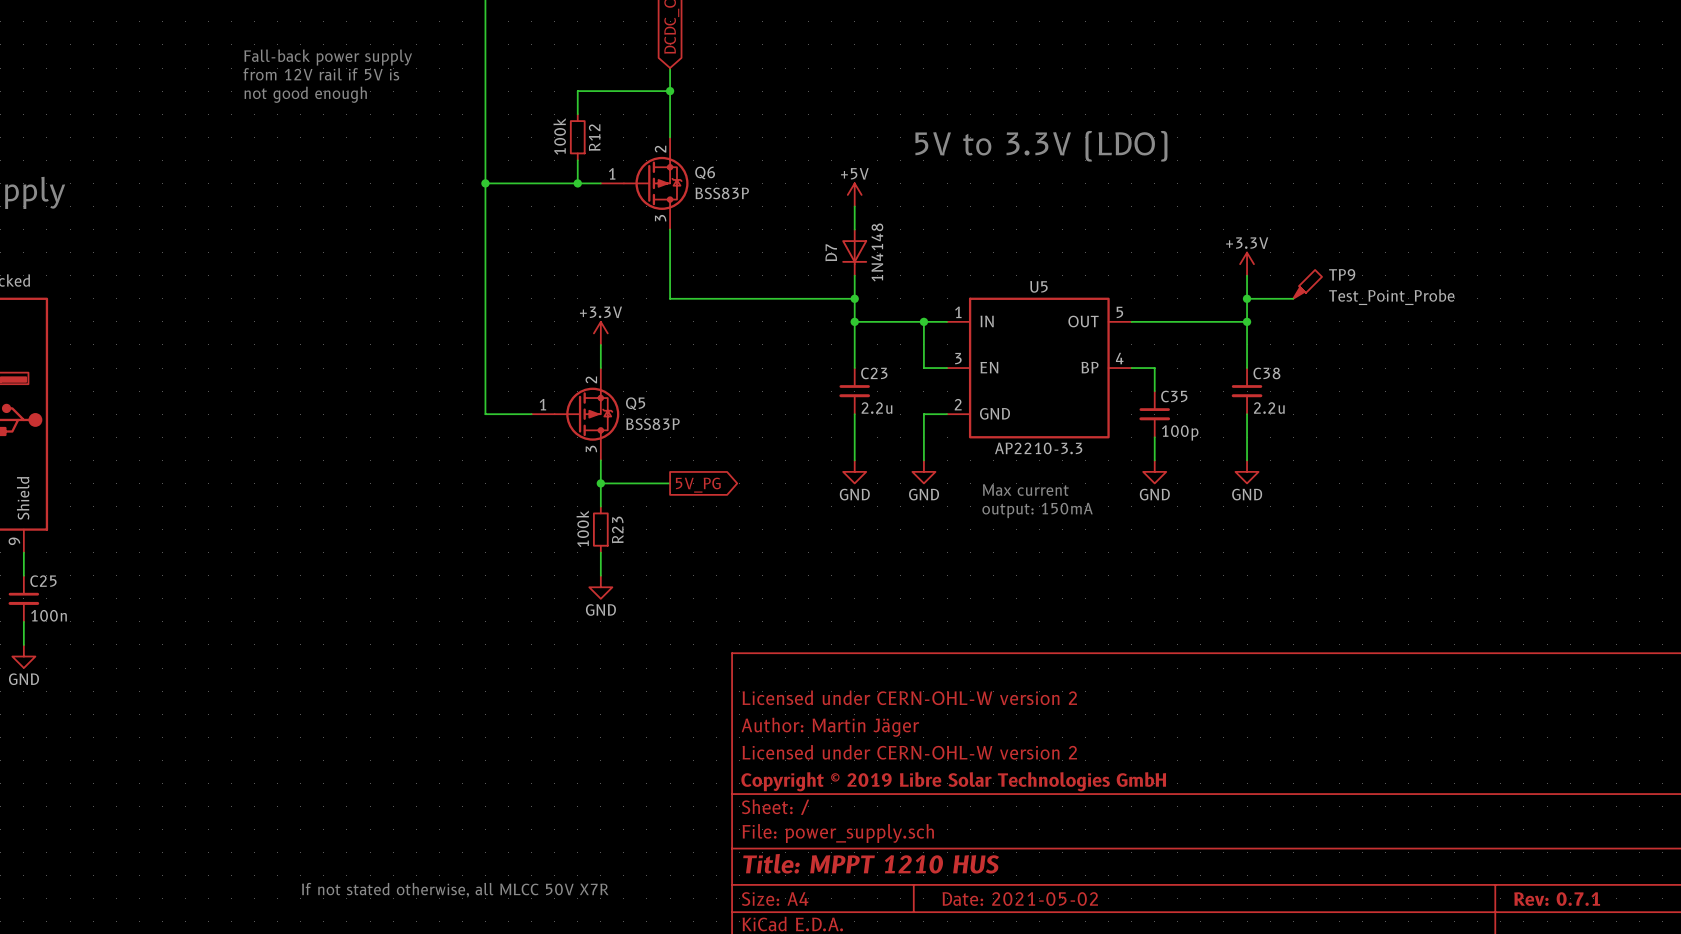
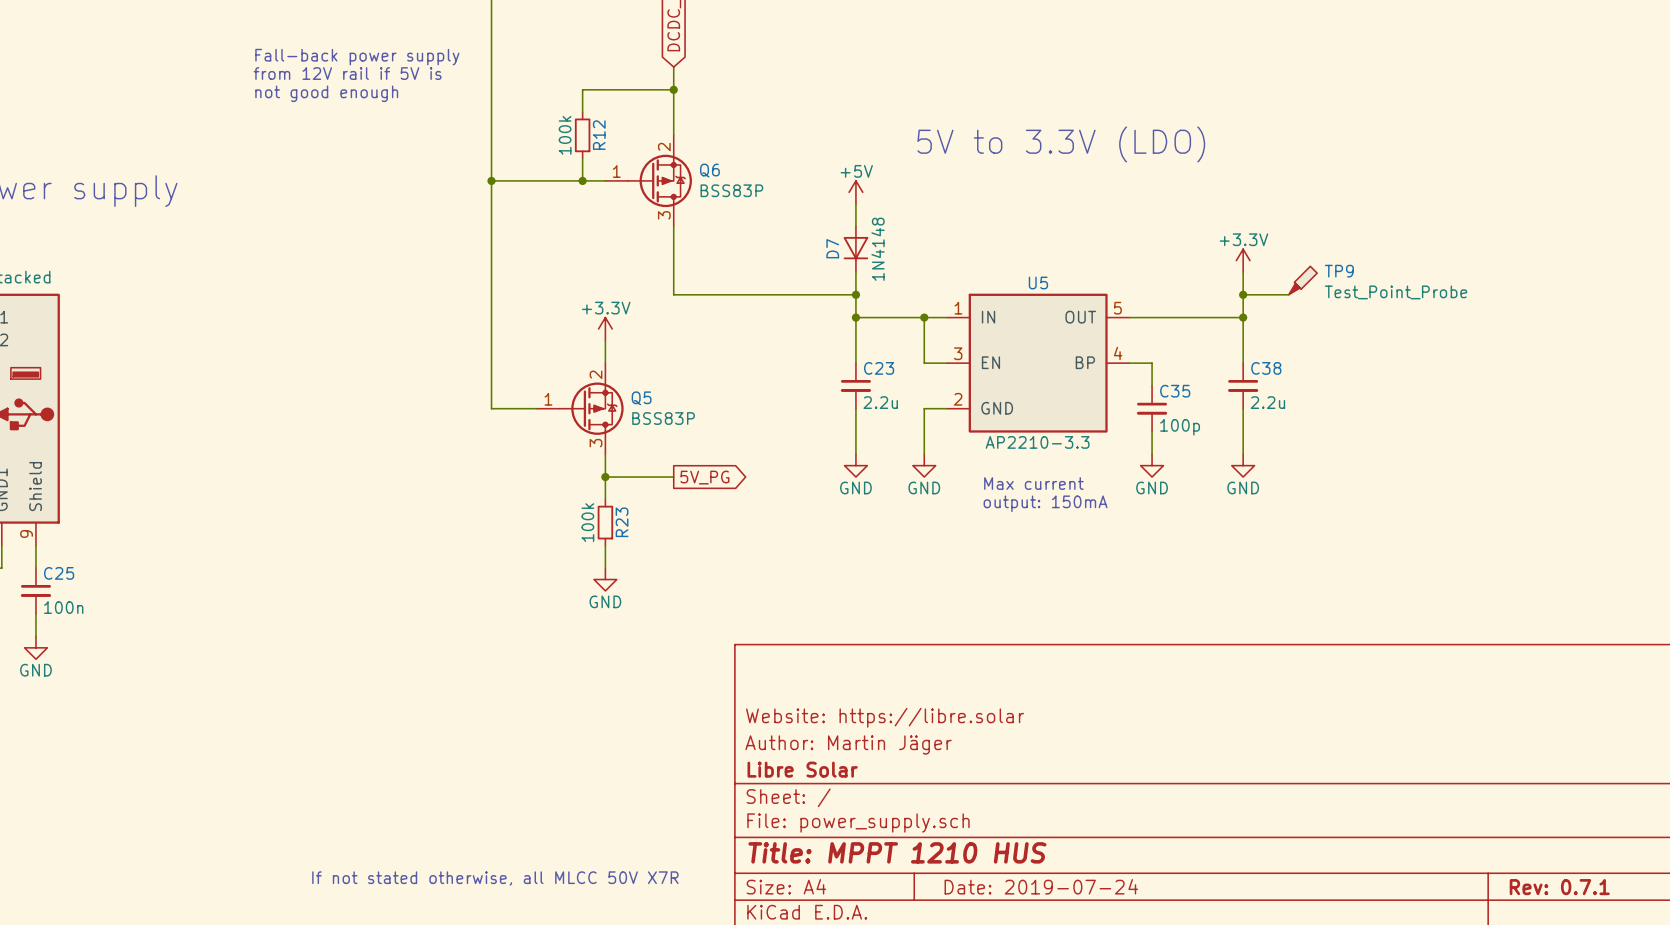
title block: Licensed under CERN-OHL-W version 2 (909, 697) -> none
title block: Author: Martin Jäger (830, 727) -> Website: https://libre.solar (885, 717)
title block: Licensed under CERN-OHL-W version 2 (909, 752) -> Author: Martin Jäger (848, 744)
title block: Copyright © 2019 Libre Solar Technologies GmbH (953, 781) -> Libre Solar (802, 769)
title block: Date: 2021-05-02 (1020, 899) -> Date: 2019-07-24 (1041, 886)

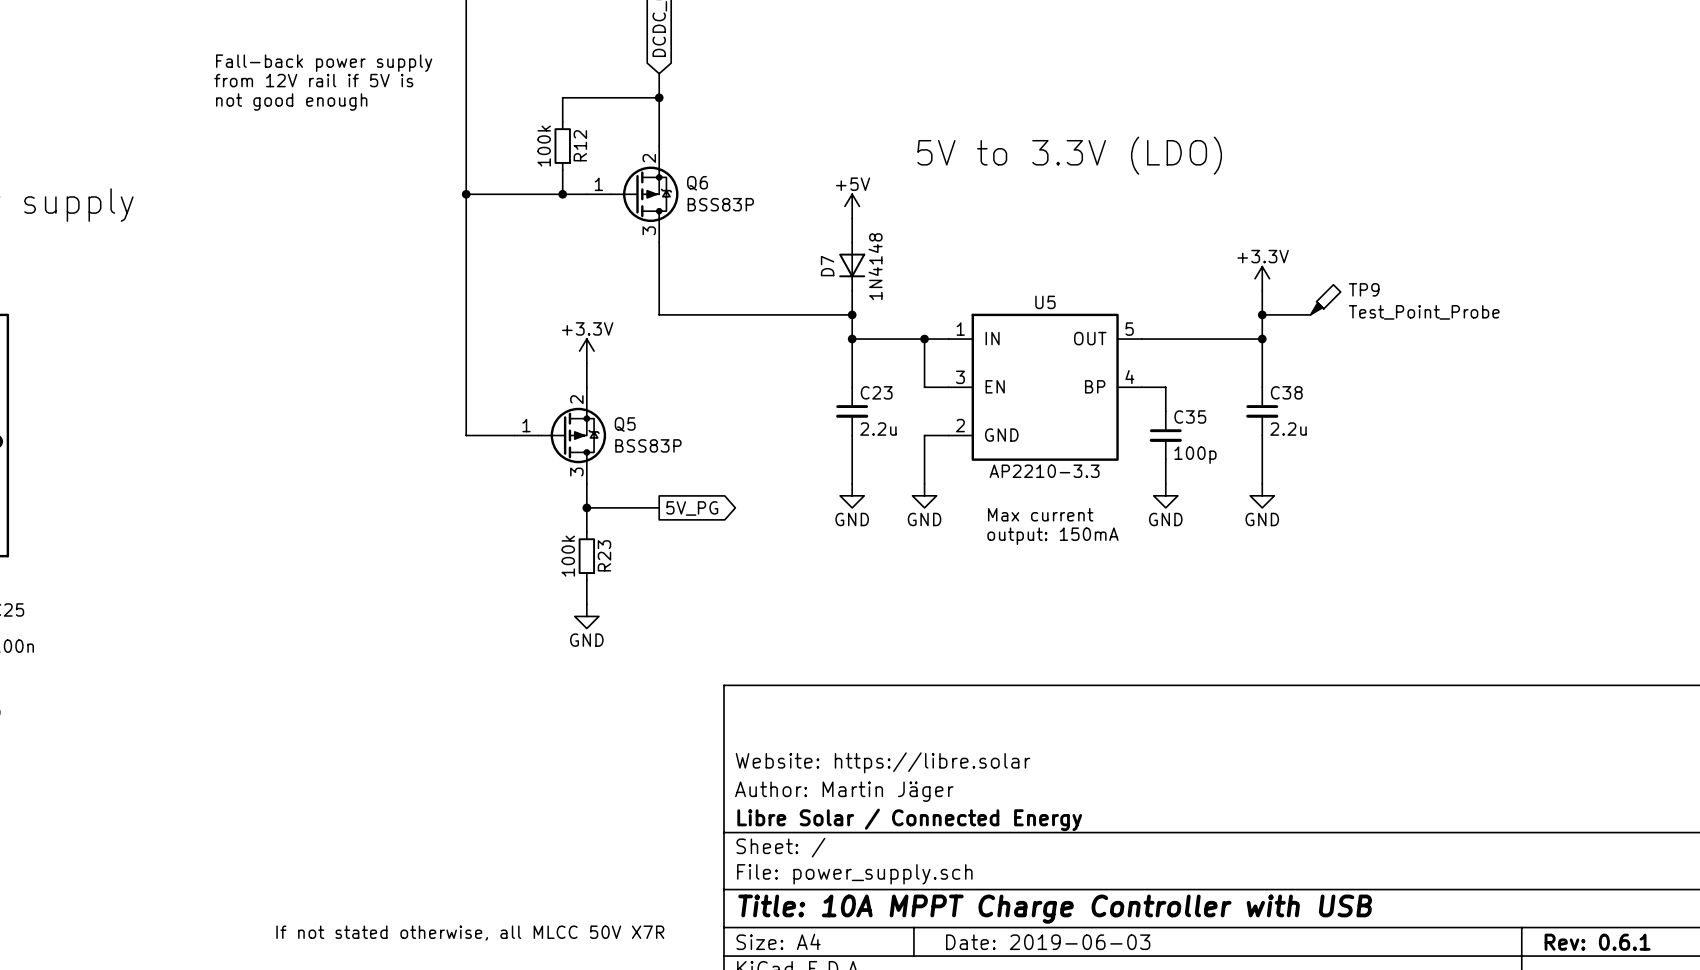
title block: Libre Solar (802, 769) -> Libre Solar / Connected Energy (909, 819)
title block: Title: MPPT 1210 HUS (897, 852) -> Title: 10A MPPT Charge Controller with USB (1055, 909)
title block: Date: 2019-07-24 (1041, 886) -> Date: 2019-06-03 (1048, 942)
title block: Rev: 0.7.1 (1559, 887) -> Rev: 0.6.1 (1597, 942)

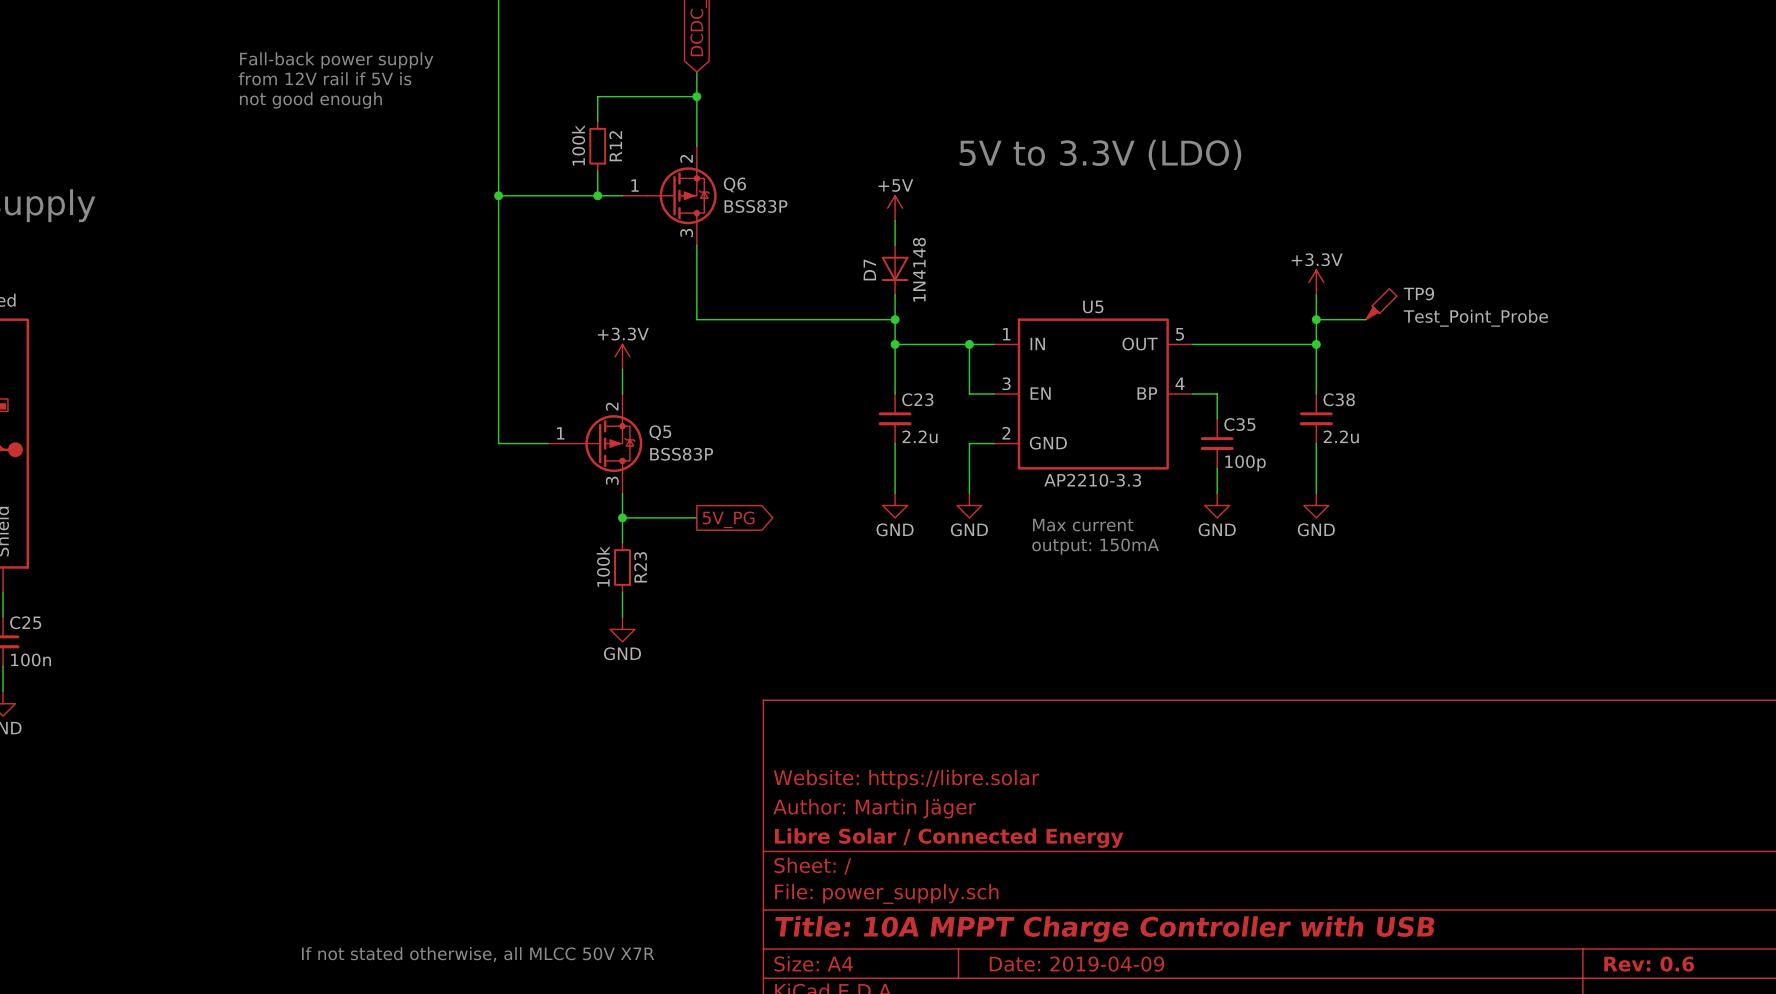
title block: Date: 2019-06-03 (1048, 942) -> Date: 2019-04-09 (1076, 964)
title block: Rev: 0.6.1 (1597, 942) -> Rev: 0.6 (1649, 964)

